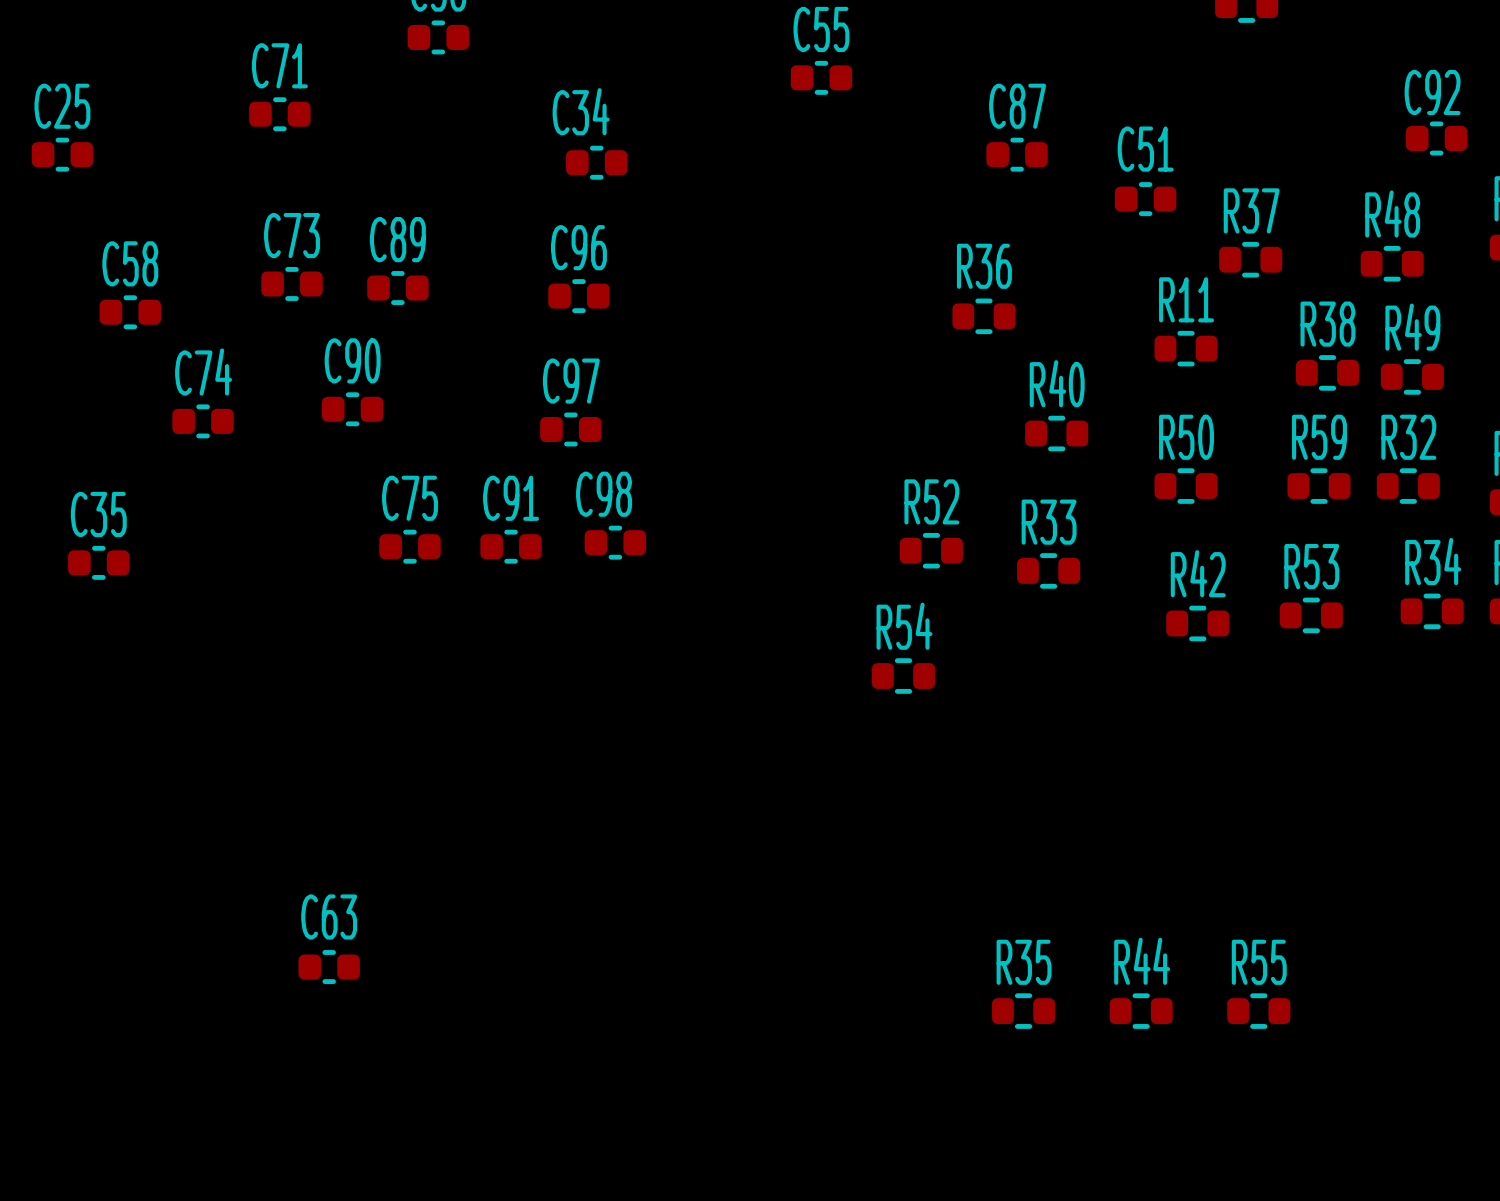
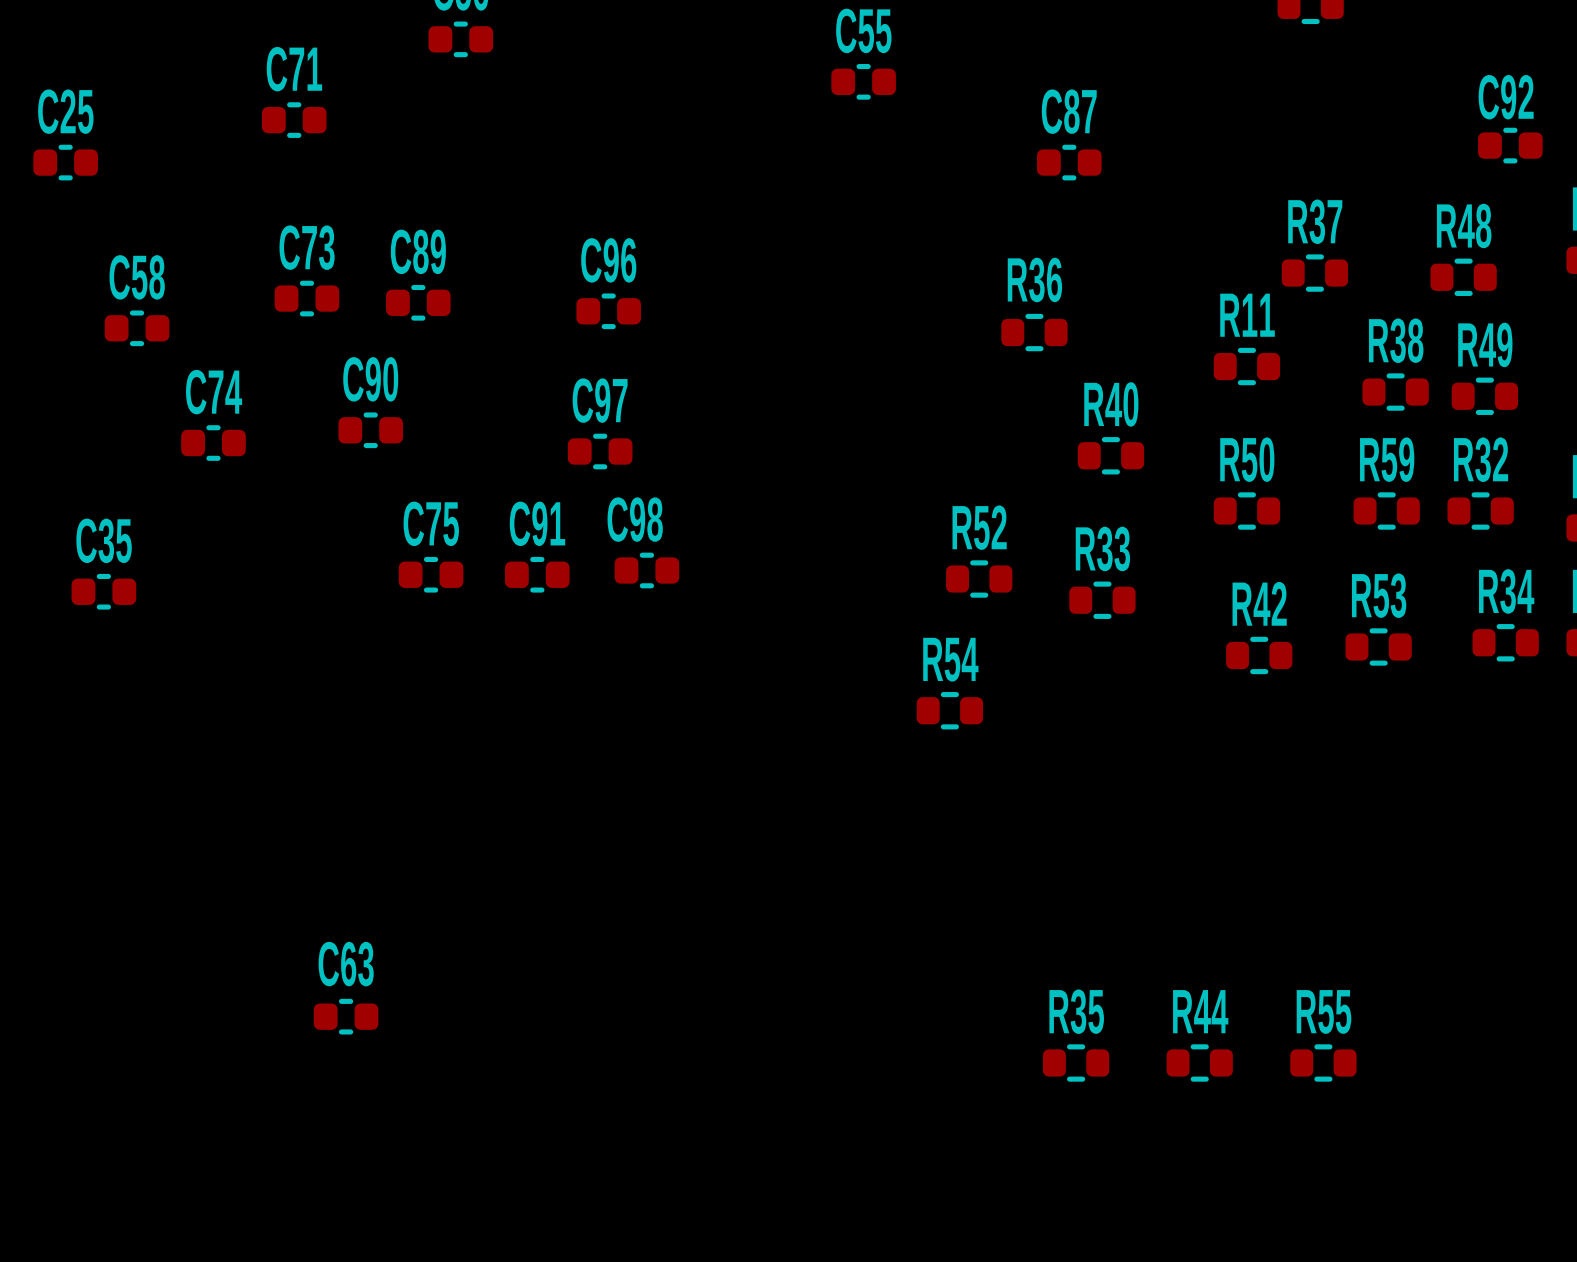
C34: (596, 162) -> none
C51: (1145, 199) -> none

